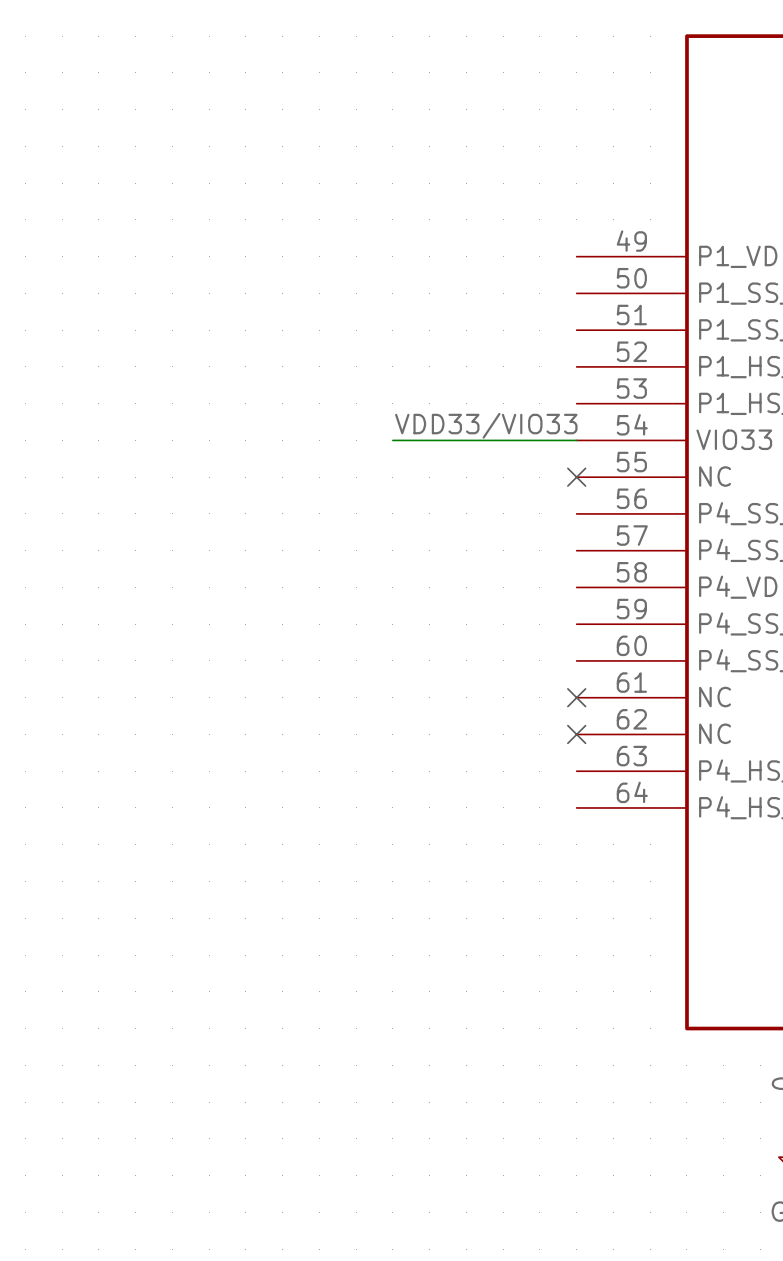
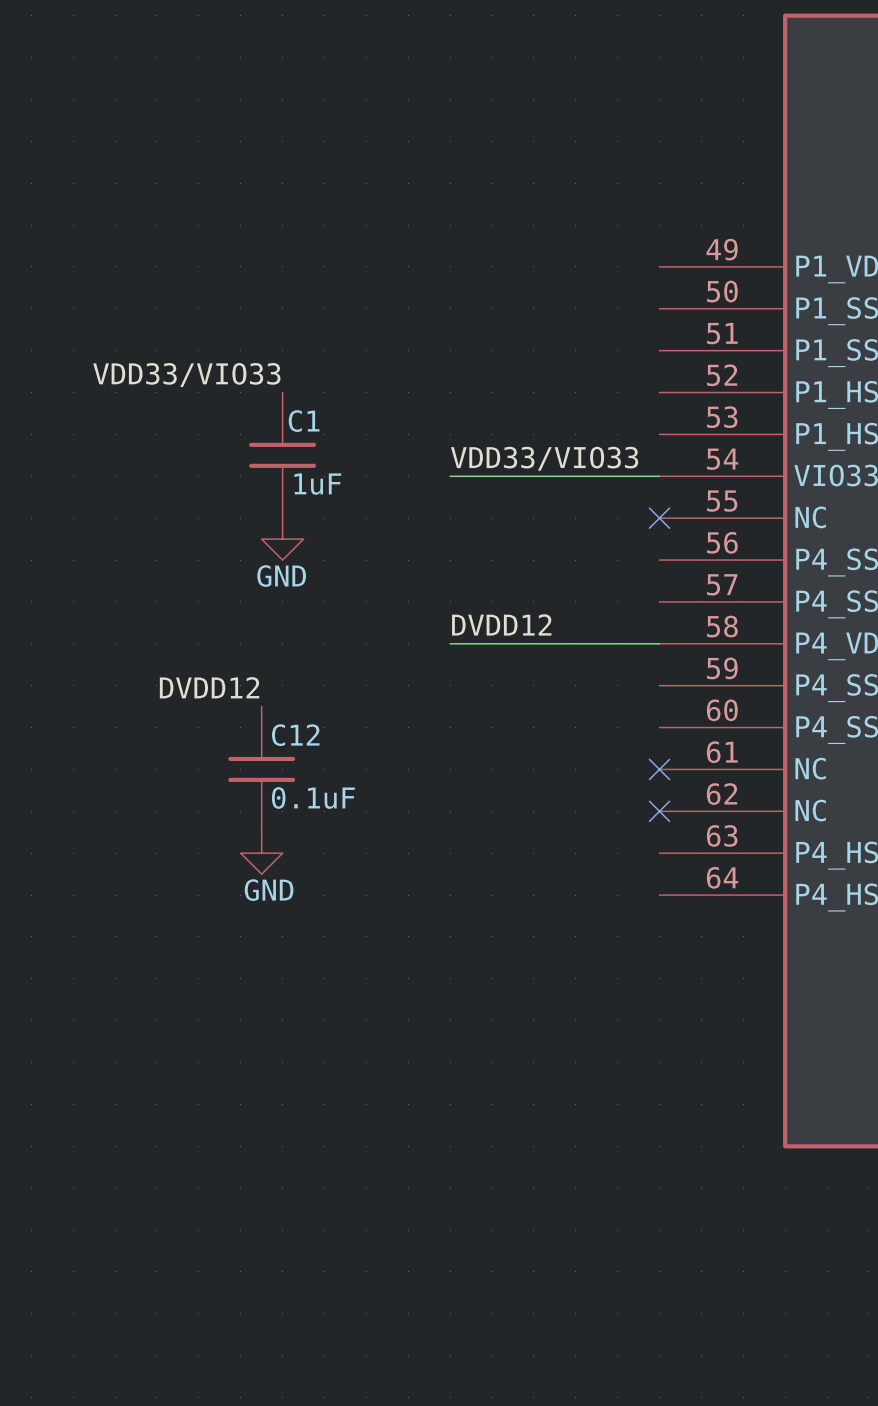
label: none -> VDD33/VIO33 (186, 374)
C1: none -> 1uF (282, 455)
power symbol: none -> GND (282, 539)
label: none -> DVDD12 (501, 624)
wire: none -> (450, 643) (659, 643)
label: none -> DVDD12 (209, 687)
C12: none -> 0.1uF (261, 769)
power symbol: none -> GND (261, 853)

